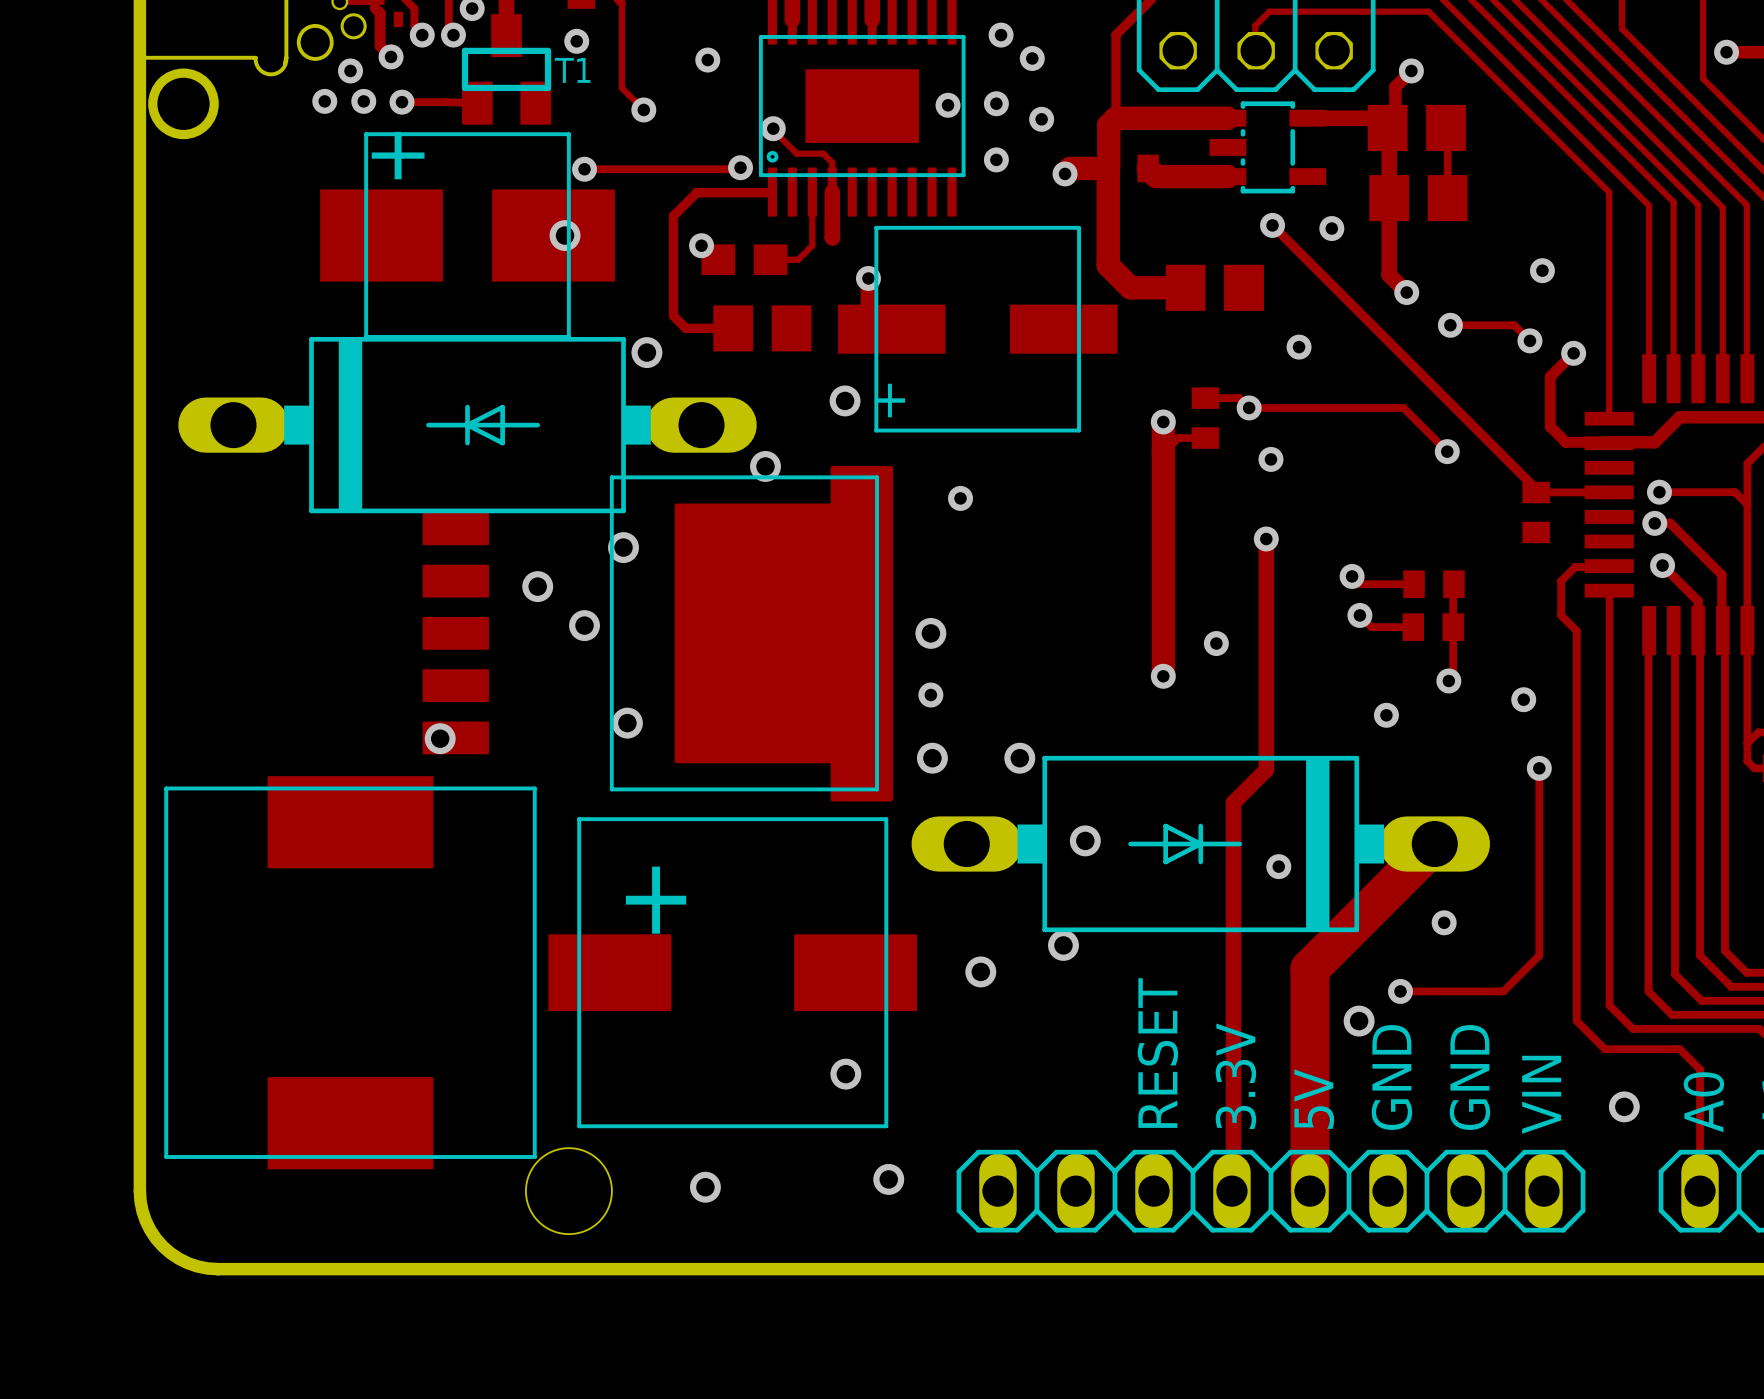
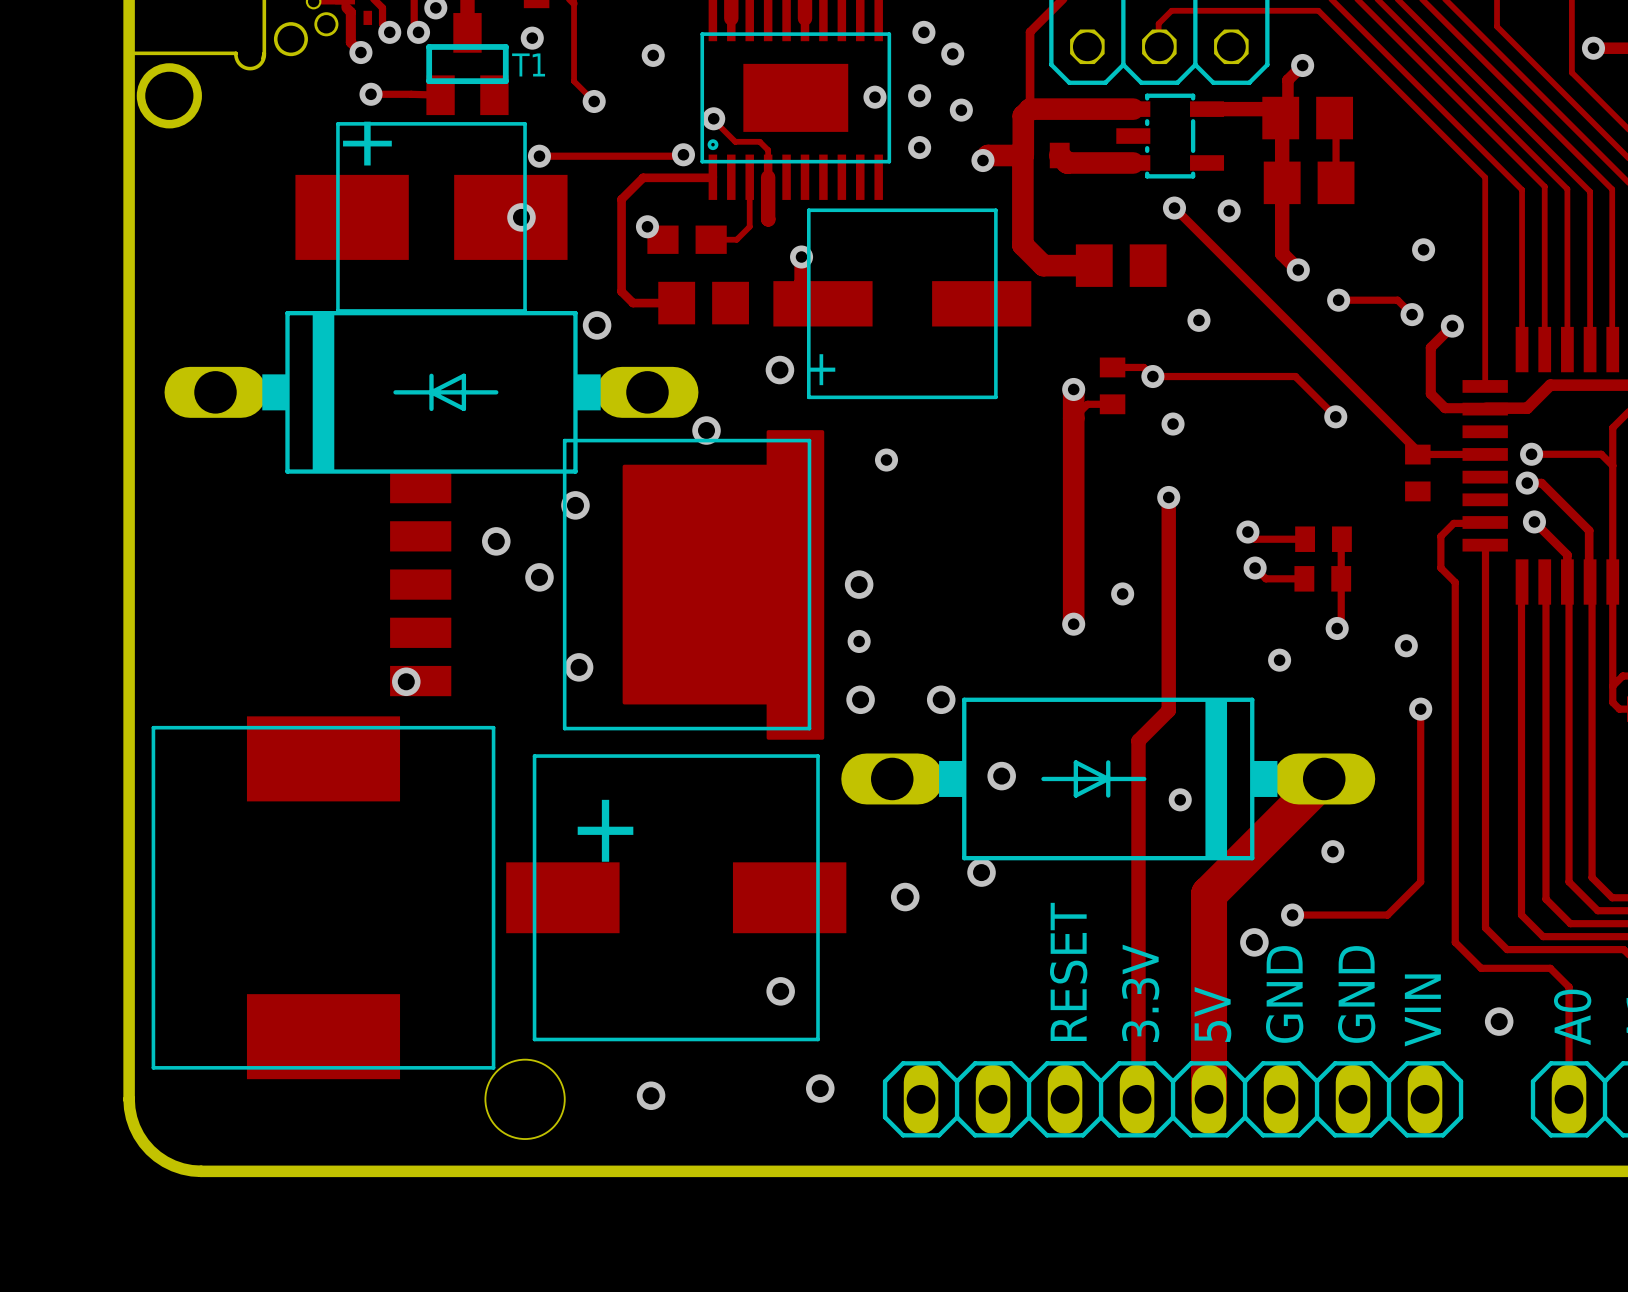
via: (350, 70) -> none
via: (324, 101) -> none
via: (363, 101) -> none

